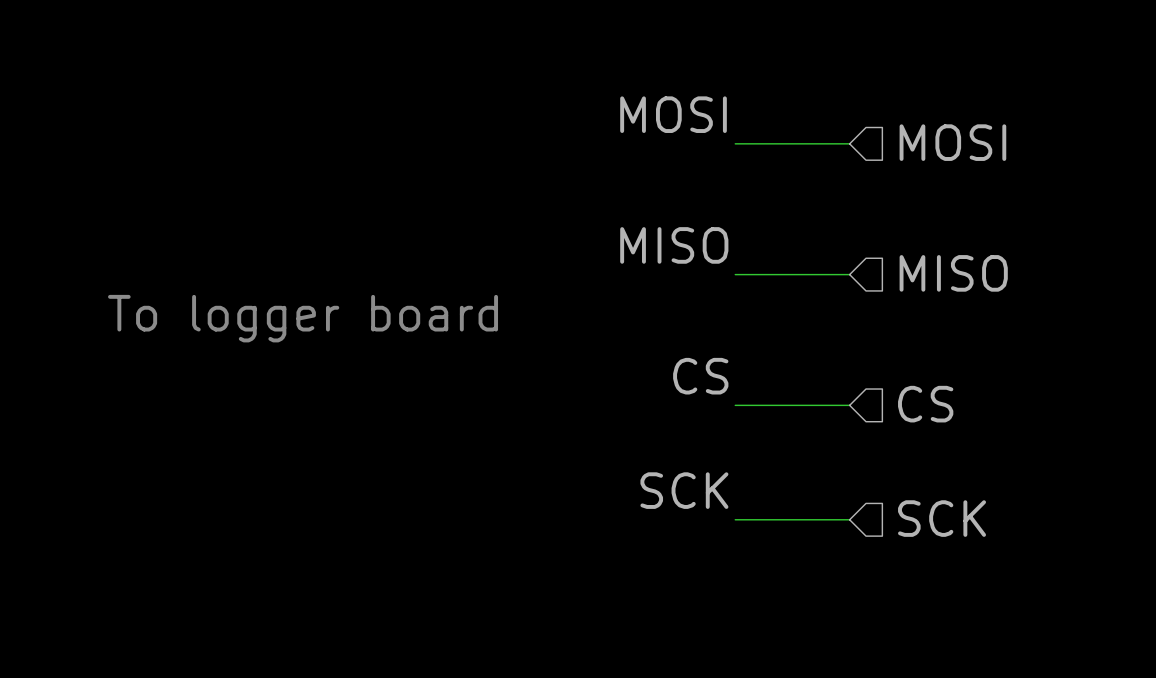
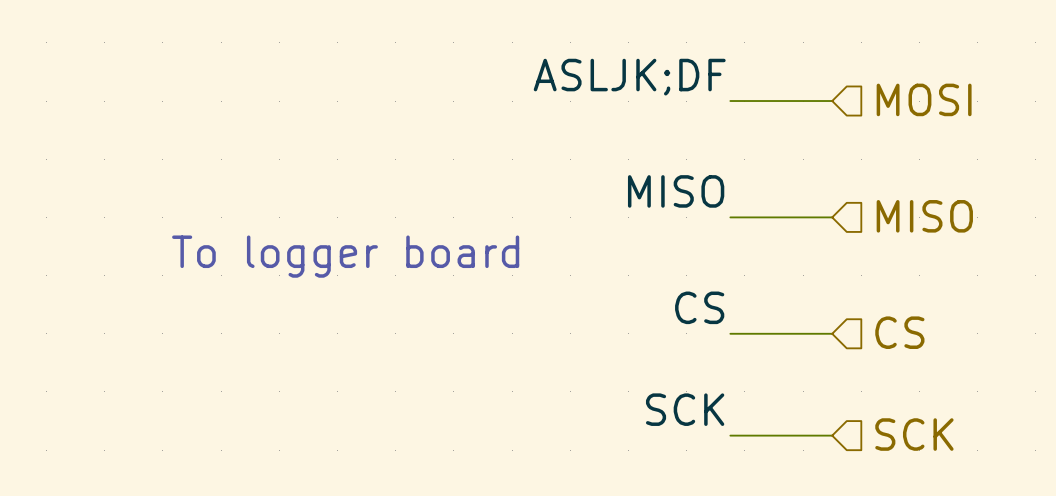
label: MOSI (673, 114) -> ASLJK;DF (629, 77)

